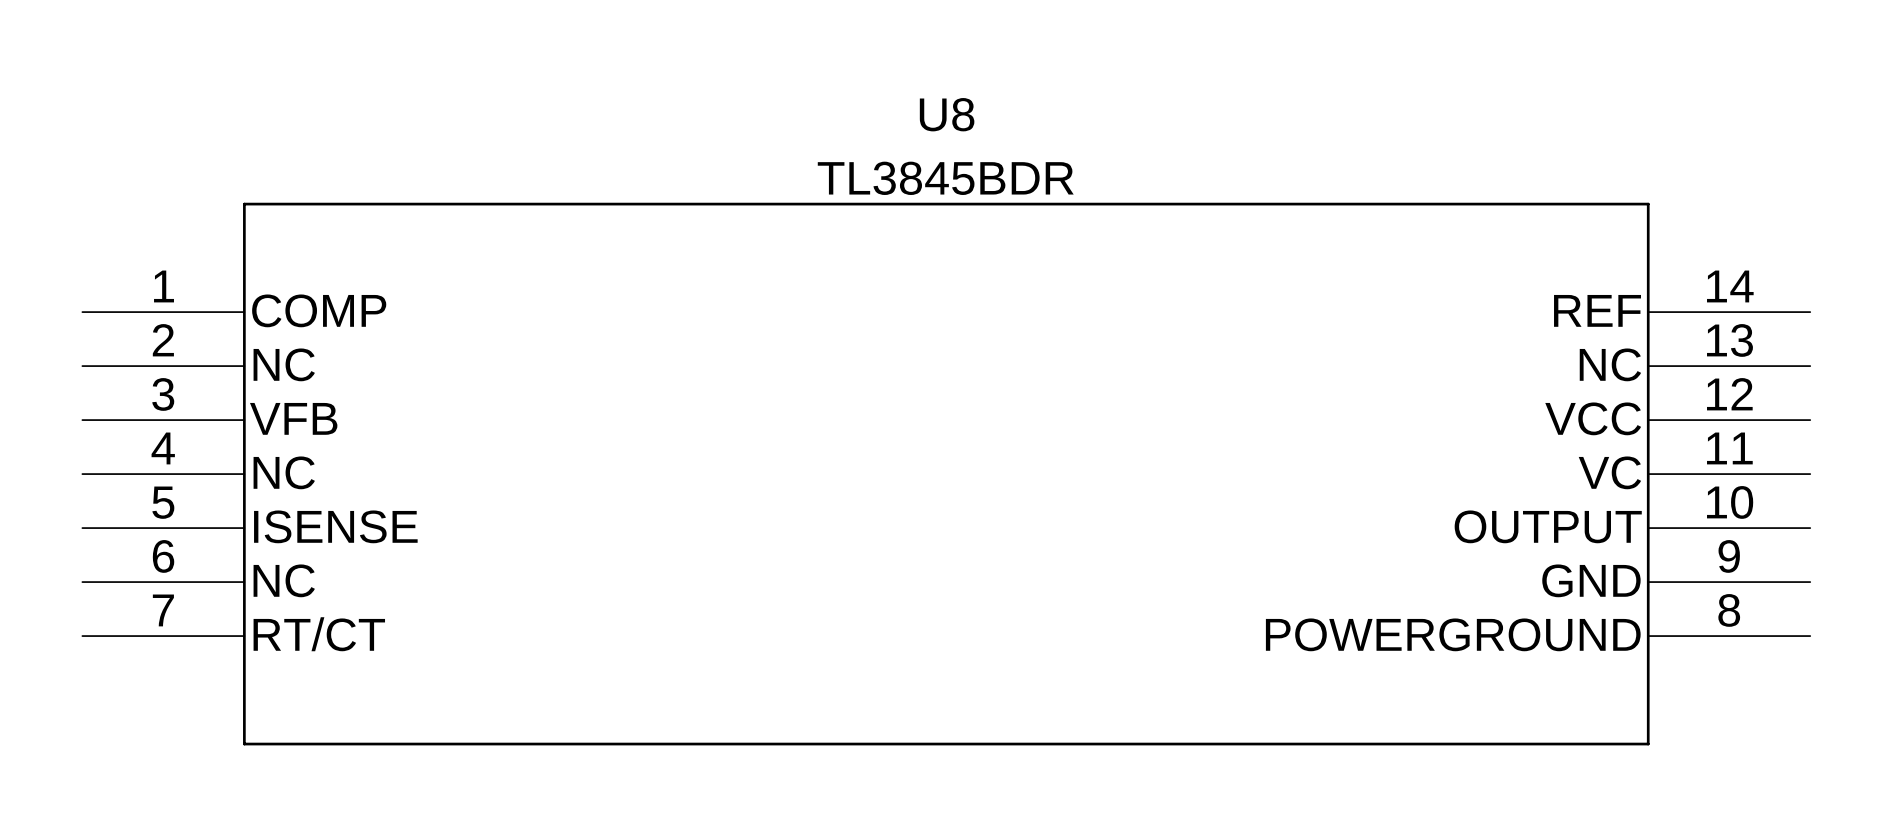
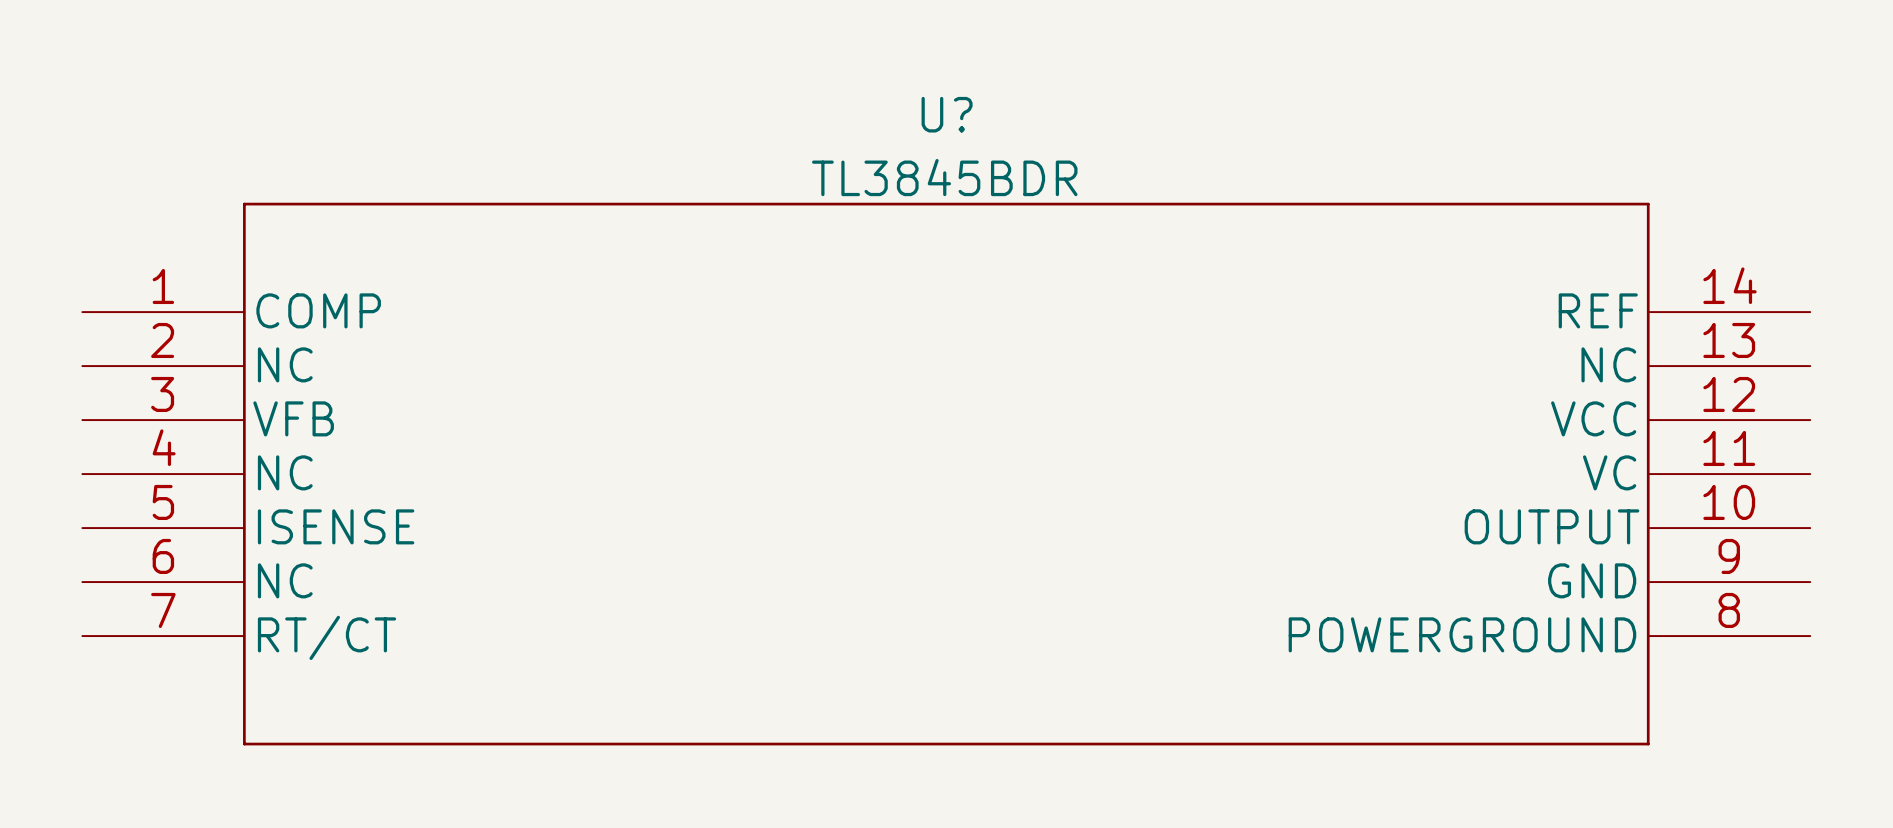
U8 name: U8 (947, 114) -> U? (947, 114)

